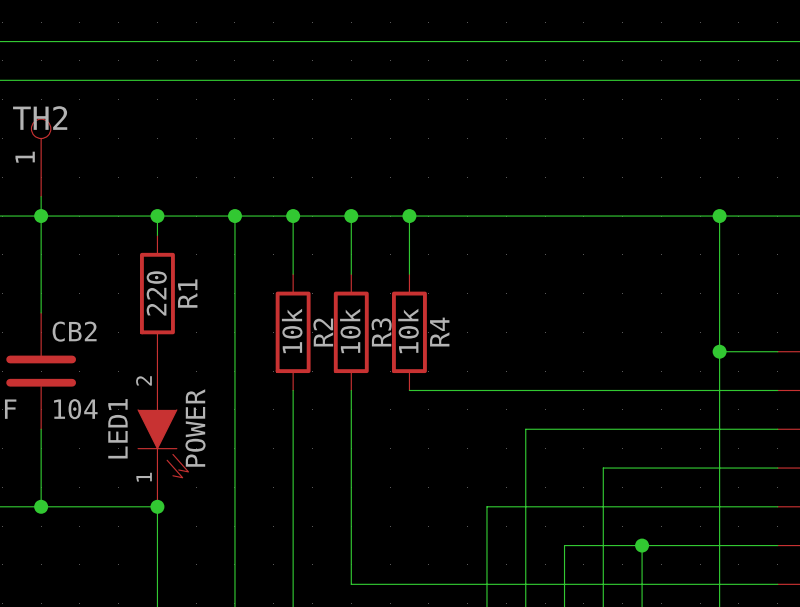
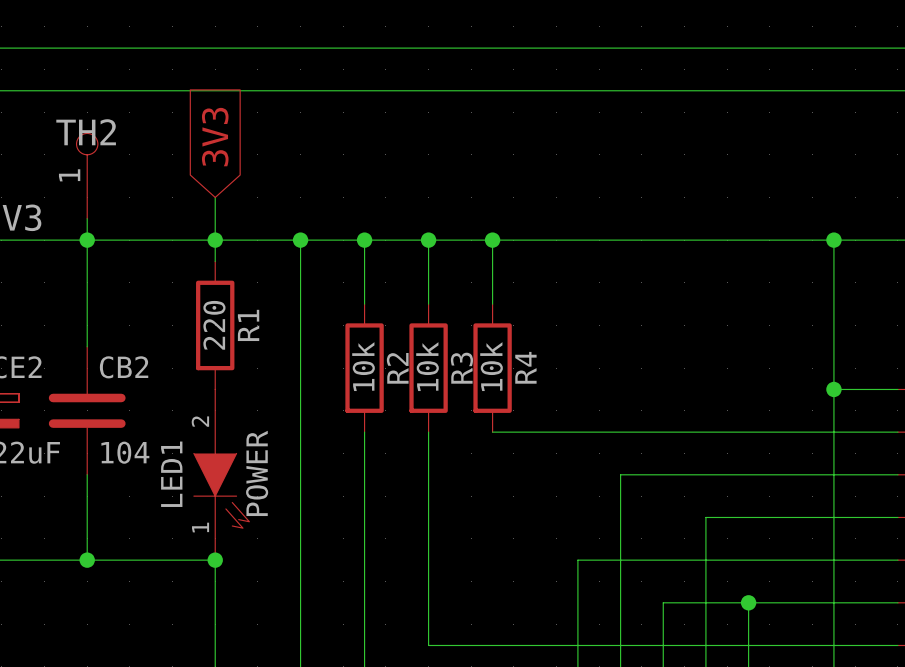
global label: none -> 3V3 (215, 137)
wire: none -> (215, 197) (215, 240)

